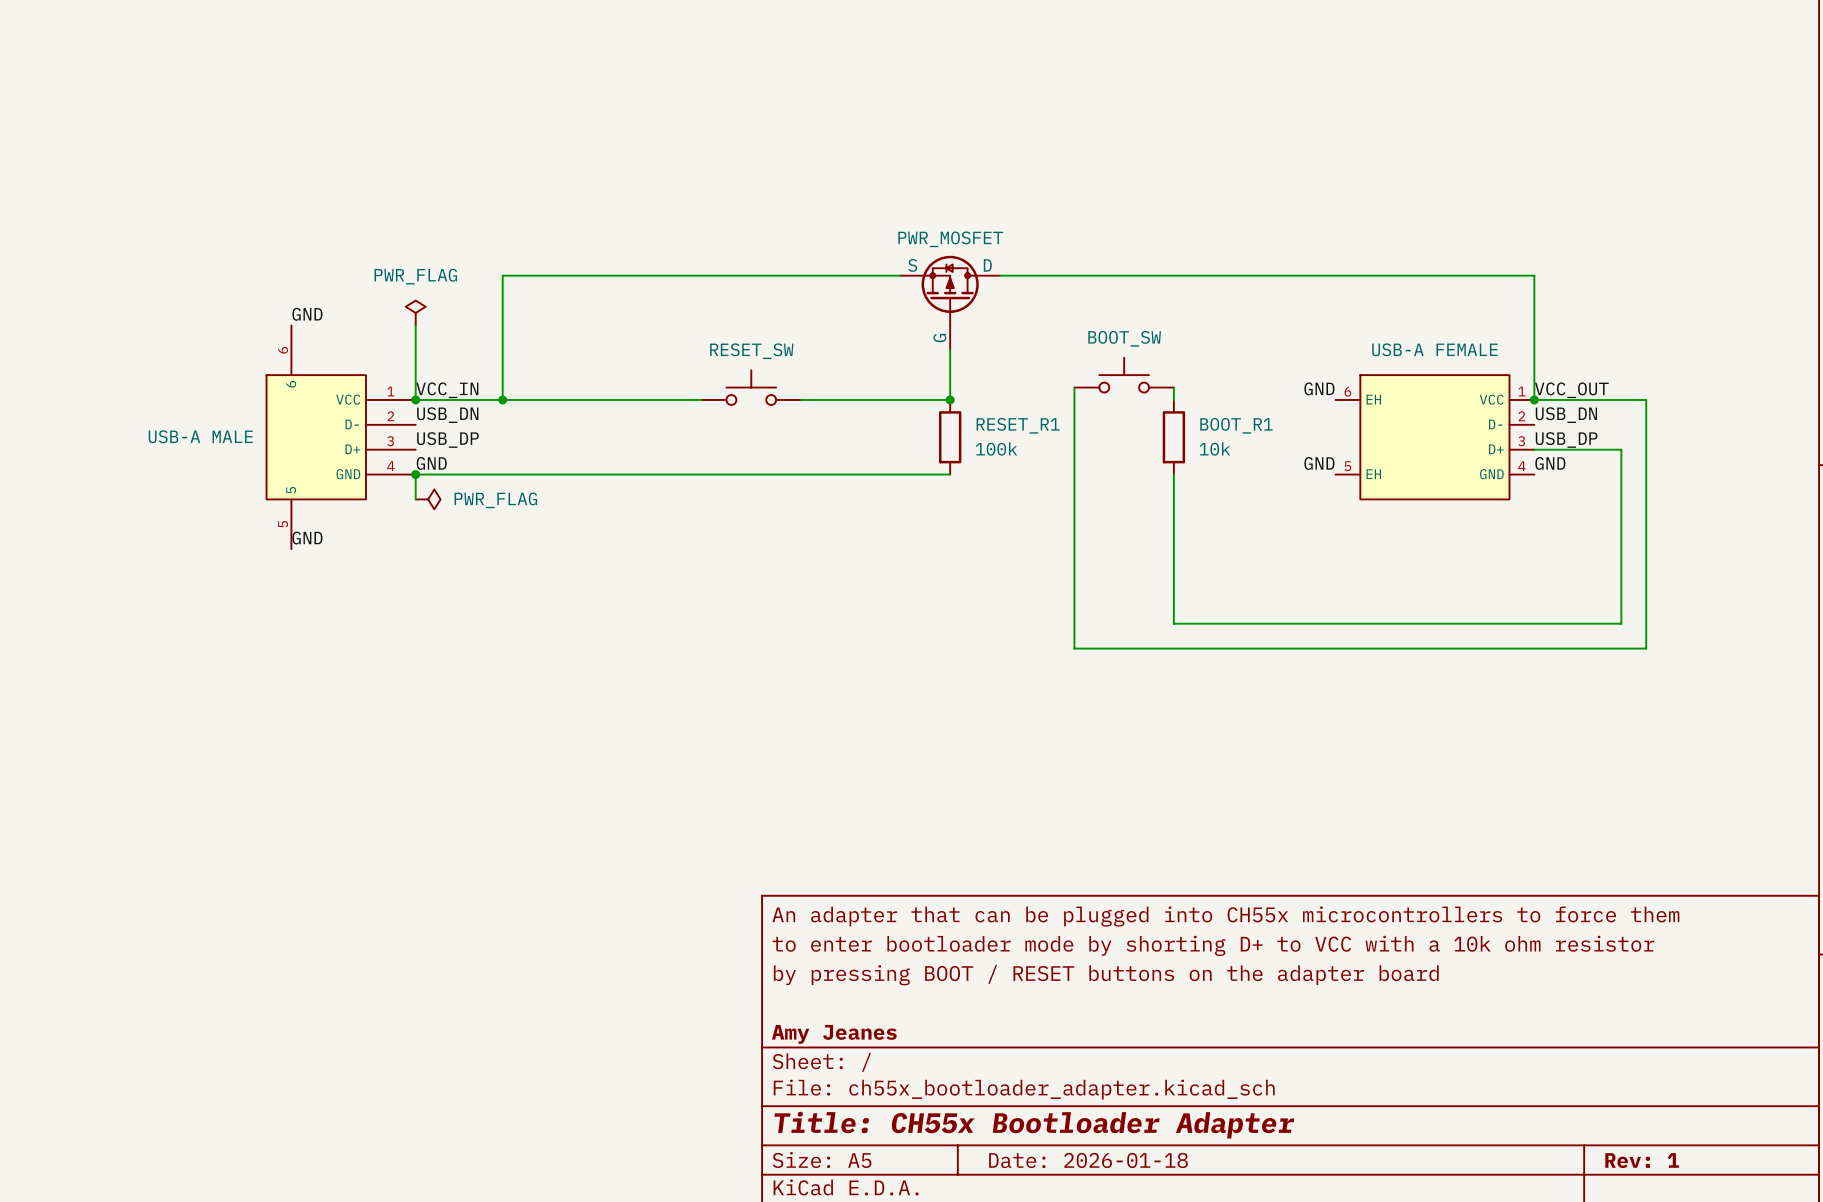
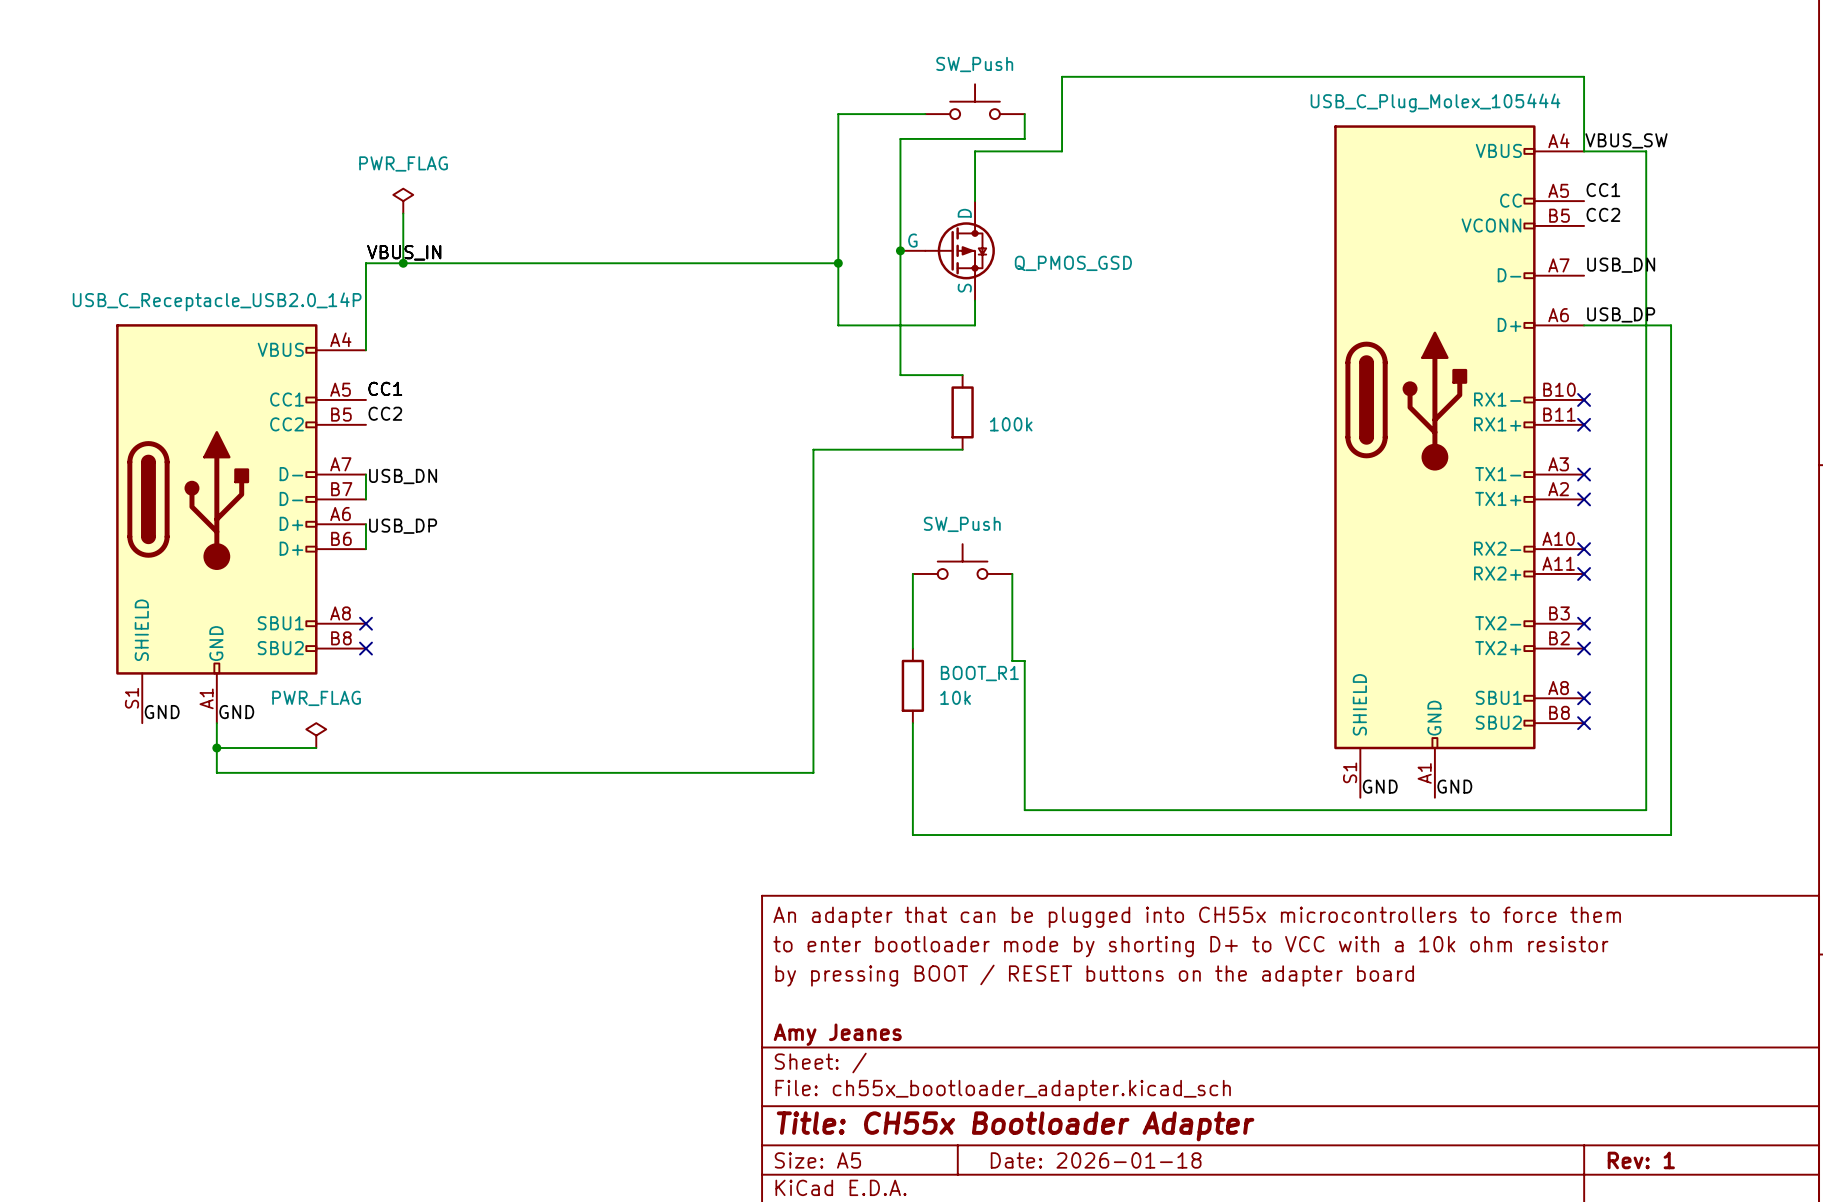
part: none -> SW_Push (975, 101)
wire: none -> (925, 114) (838, 114) (838, 325) (975, 325) (975, 300)
wire: none -> (1024, 114) (1024, 138) (900, 138) (900, 375) (962, 375)
label: none -> VBUS_SW (1626, 140)
label: none -> CC1 (1603, 190)
wire: none -> (403, 213) (403, 263)
label: none -> CC2 (1603, 214)
junction: none -> (900, 250)
part: none -> Q_PMOS_GSD (947, 250)
label: none -> VBUS_IN (404, 252)
junction: none -> (403, 263)
wire: none -> (838, 263) (365, 263) (365, 350)
junction: none -> (838, 263)
wire: (900, 275) (502, 275) (502, 399) -> none
wire: (999, 275) (1534, 275) (1534, 399) (1646, 399) -> (975, 201) (975, 151) (1062, 151) (1062, 76) (1584, 76) (1584, 151) (1646, 151) (1646, 399)
part: PWR_MOSFET (950, 303) -> none
power symbol position: PWR_FLAG (415, 312) -> PWR_FLAG (403, 201)
label: GND (307, 314) -> none
wire: (415, 325) (415, 399) (701, 399) -> none
wire: none -> (1584, 325) (1671, 325) (1671, 835) (912, 835) (912, 723)
wire: (950, 350) (950, 399) (801, 399) -> none
part: BOOT_SW (1124, 375) -> none
part: RESET_SW (751, 387) -> none
wire: (1074, 387) (1074, 648) (1646, 648) -> (1012, 573) (1012, 661) (1024, 661) (1024, 810) (1646, 810) (1646, 648)
wire: (1173, 387) (1173, 399) -> none
label: none -> CC1 (385, 388)
label: GND (1319, 388) -> none
label: VCC_IN (447, 390) -> none
label: VCC_OUT (1571, 390) -> none
junction: (415, 399) -> none
junction: (502, 399) -> none
junction: (950, 399) -> none
junction: (1534, 399) -> none
no-connect mark: none -> (1584, 399)
part: none -> 100k (962, 412)
label: none -> CC2 (385, 413)
label position: USB_DN (447, 415) -> USB_DN (403, 476)
label position: USB_DN (1566, 415) -> USB_DN (1621, 265)
no-connect mark: none -> (1584, 424)
part: USB-A MALE (341, 437) -> none
RESET_R1: 100k (950, 437) -> none
BOOT_R1 position: (1173, 437) -> (912, 685)
part: USB-A FEMALE (1434, 437) -> none
label position: USB_DP (447, 440) -> USB_DP (403, 526)
label position: USB_DP (1566, 440) -> USB_DP (1621, 314)
wire: none -> (962, 449) (813, 449) (813, 772) (216, 772) (216, 723)
wire: (1534, 449) (1621, 449) (1621, 623) (1173, 623) (1173, 474) -> none
part: none -> USB_C_Plug_Molex_105444 (1459, 461)
label: GND (431, 463) -> none
label: GND (1319, 463) -> none
label: GND (1550, 463) -> none
junction: (415, 474) -> none
wire: (950, 474) (415, 474) (415, 499) -> none
no-connect mark: none -> (1584, 474)
power symbol: PWR_FLAG (428, 499) -> none
no-connect mark: none -> (1584, 499)
part: none -> USB_C_Receptacle_USB2.0_14P (241, 523)
wire: none -> (365, 524) (365, 549)
label: GND (307, 538) -> none
no-connect mark: none -> (1584, 549)
part: none -> SW_Push (962, 561)
wire: none -> (912, 573) (912, 648)
no-connect mark: none -> (1584, 573)
no-connect mark: none -> (365, 623)
no-connect mark: none -> (1584, 623)
no-connect mark: none -> (365, 648)
no-connect mark: none -> (1584, 648)
no-connect mark: none -> (1584, 698)
label: none -> GND (162, 712)
label: none -> GND (236, 712)
no-connect mark: none -> (1584, 723)
power symbol: none -> PWR_FLAG (316, 735)
wire: none -> (216, 748) (316, 748)
junction: none -> (216, 748)
label: none -> GND (1380, 786)
label: none -> GND (1454, 786)

